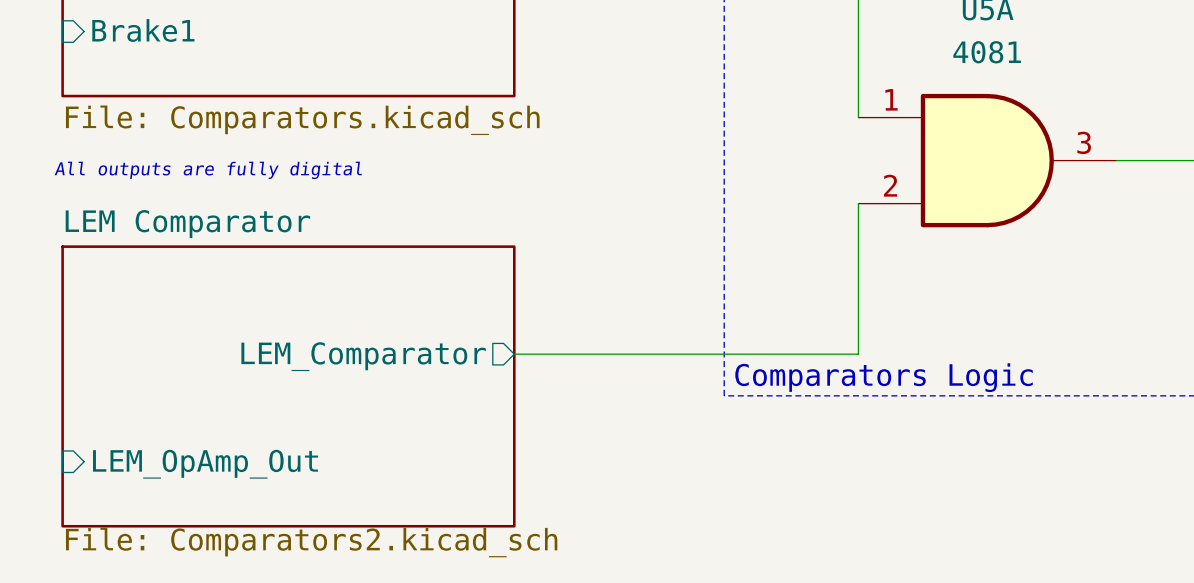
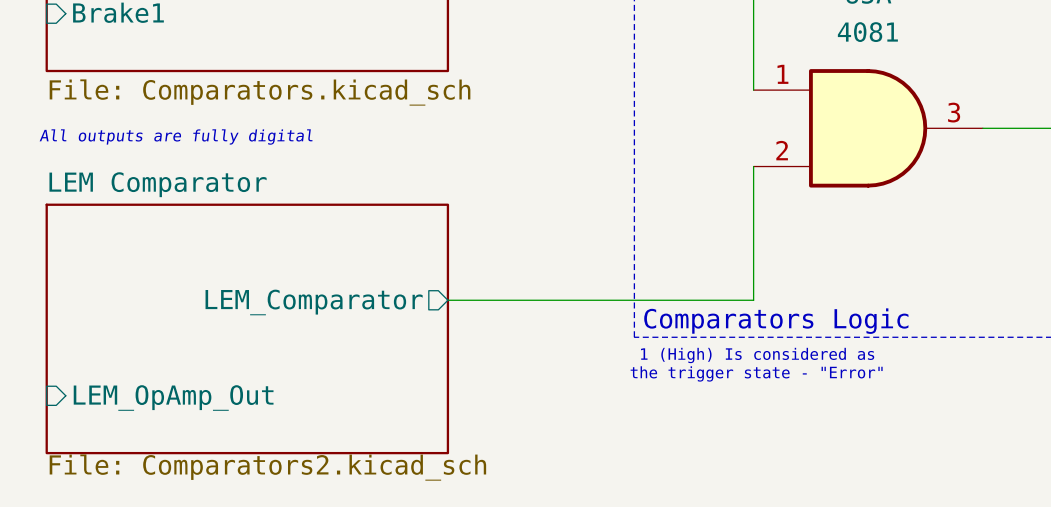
text: none -> 1 (High) Is considered as (757, 355)
text: none -> the trigger state - "Error" (756, 373)

